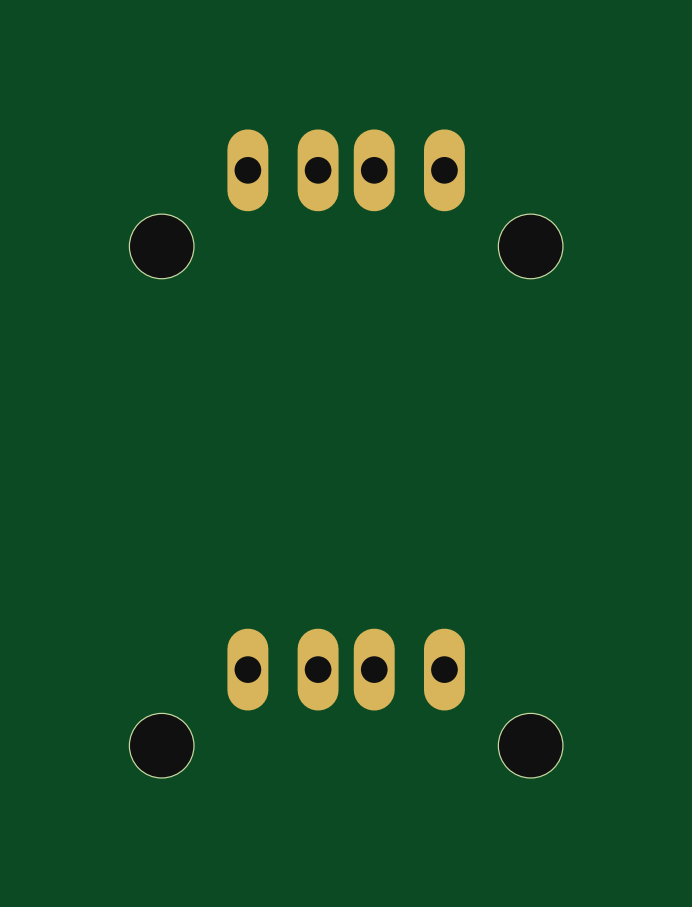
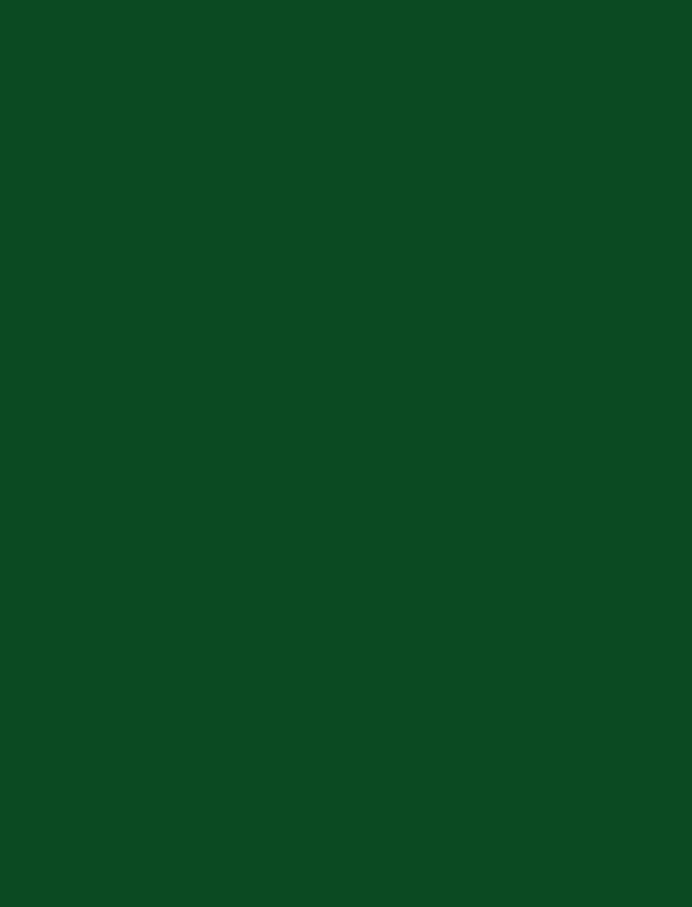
part: (346, 204) -> none
part: (346, 703) -> none

